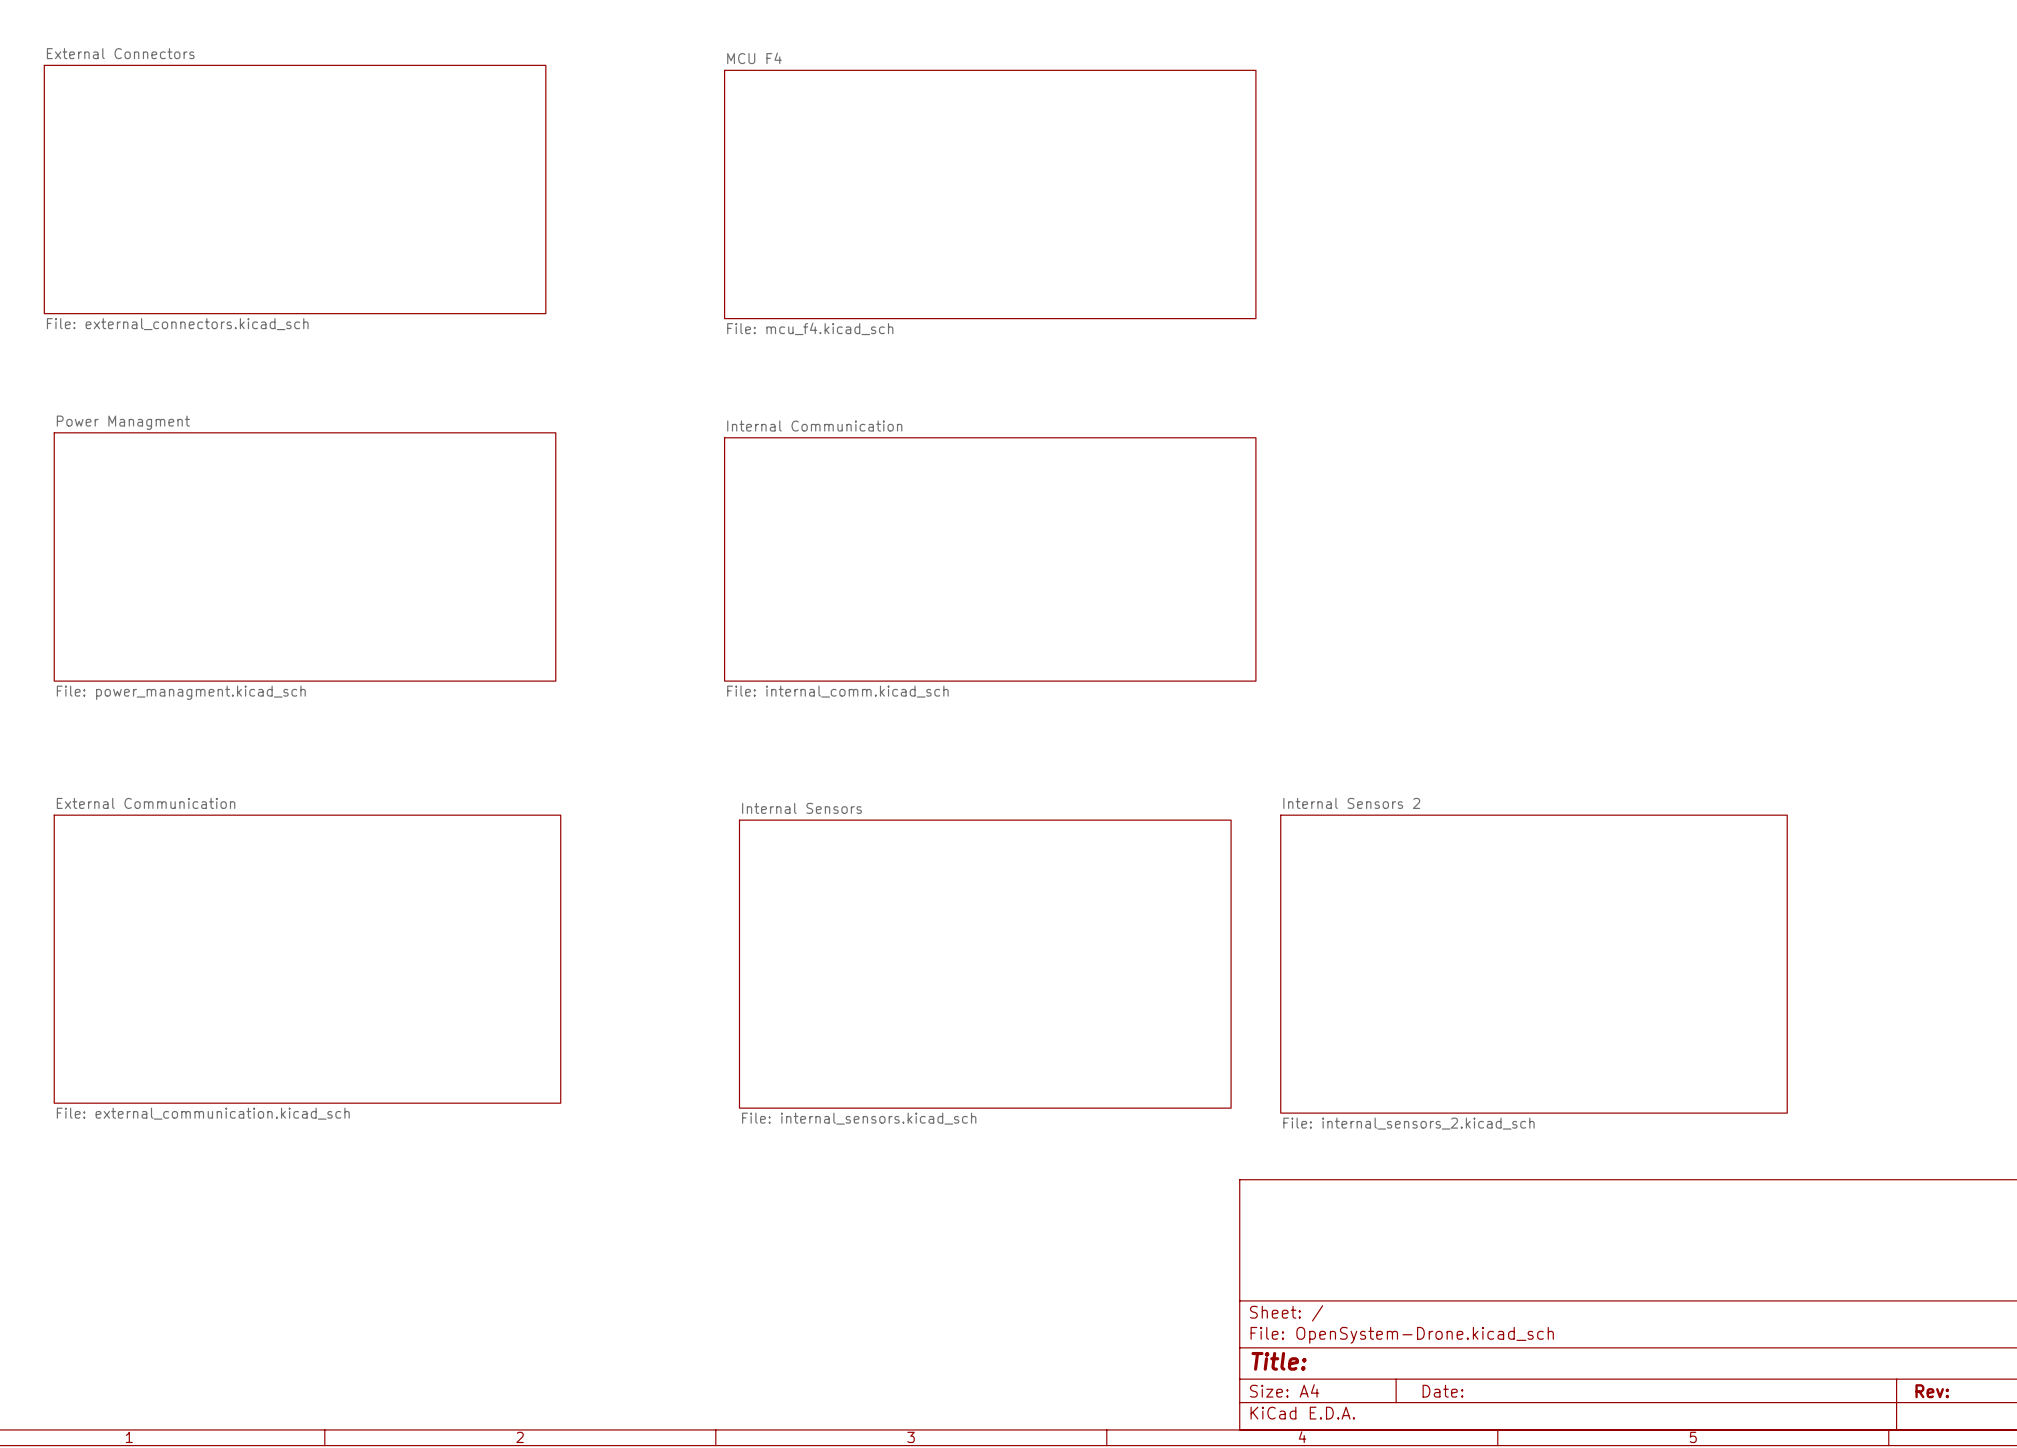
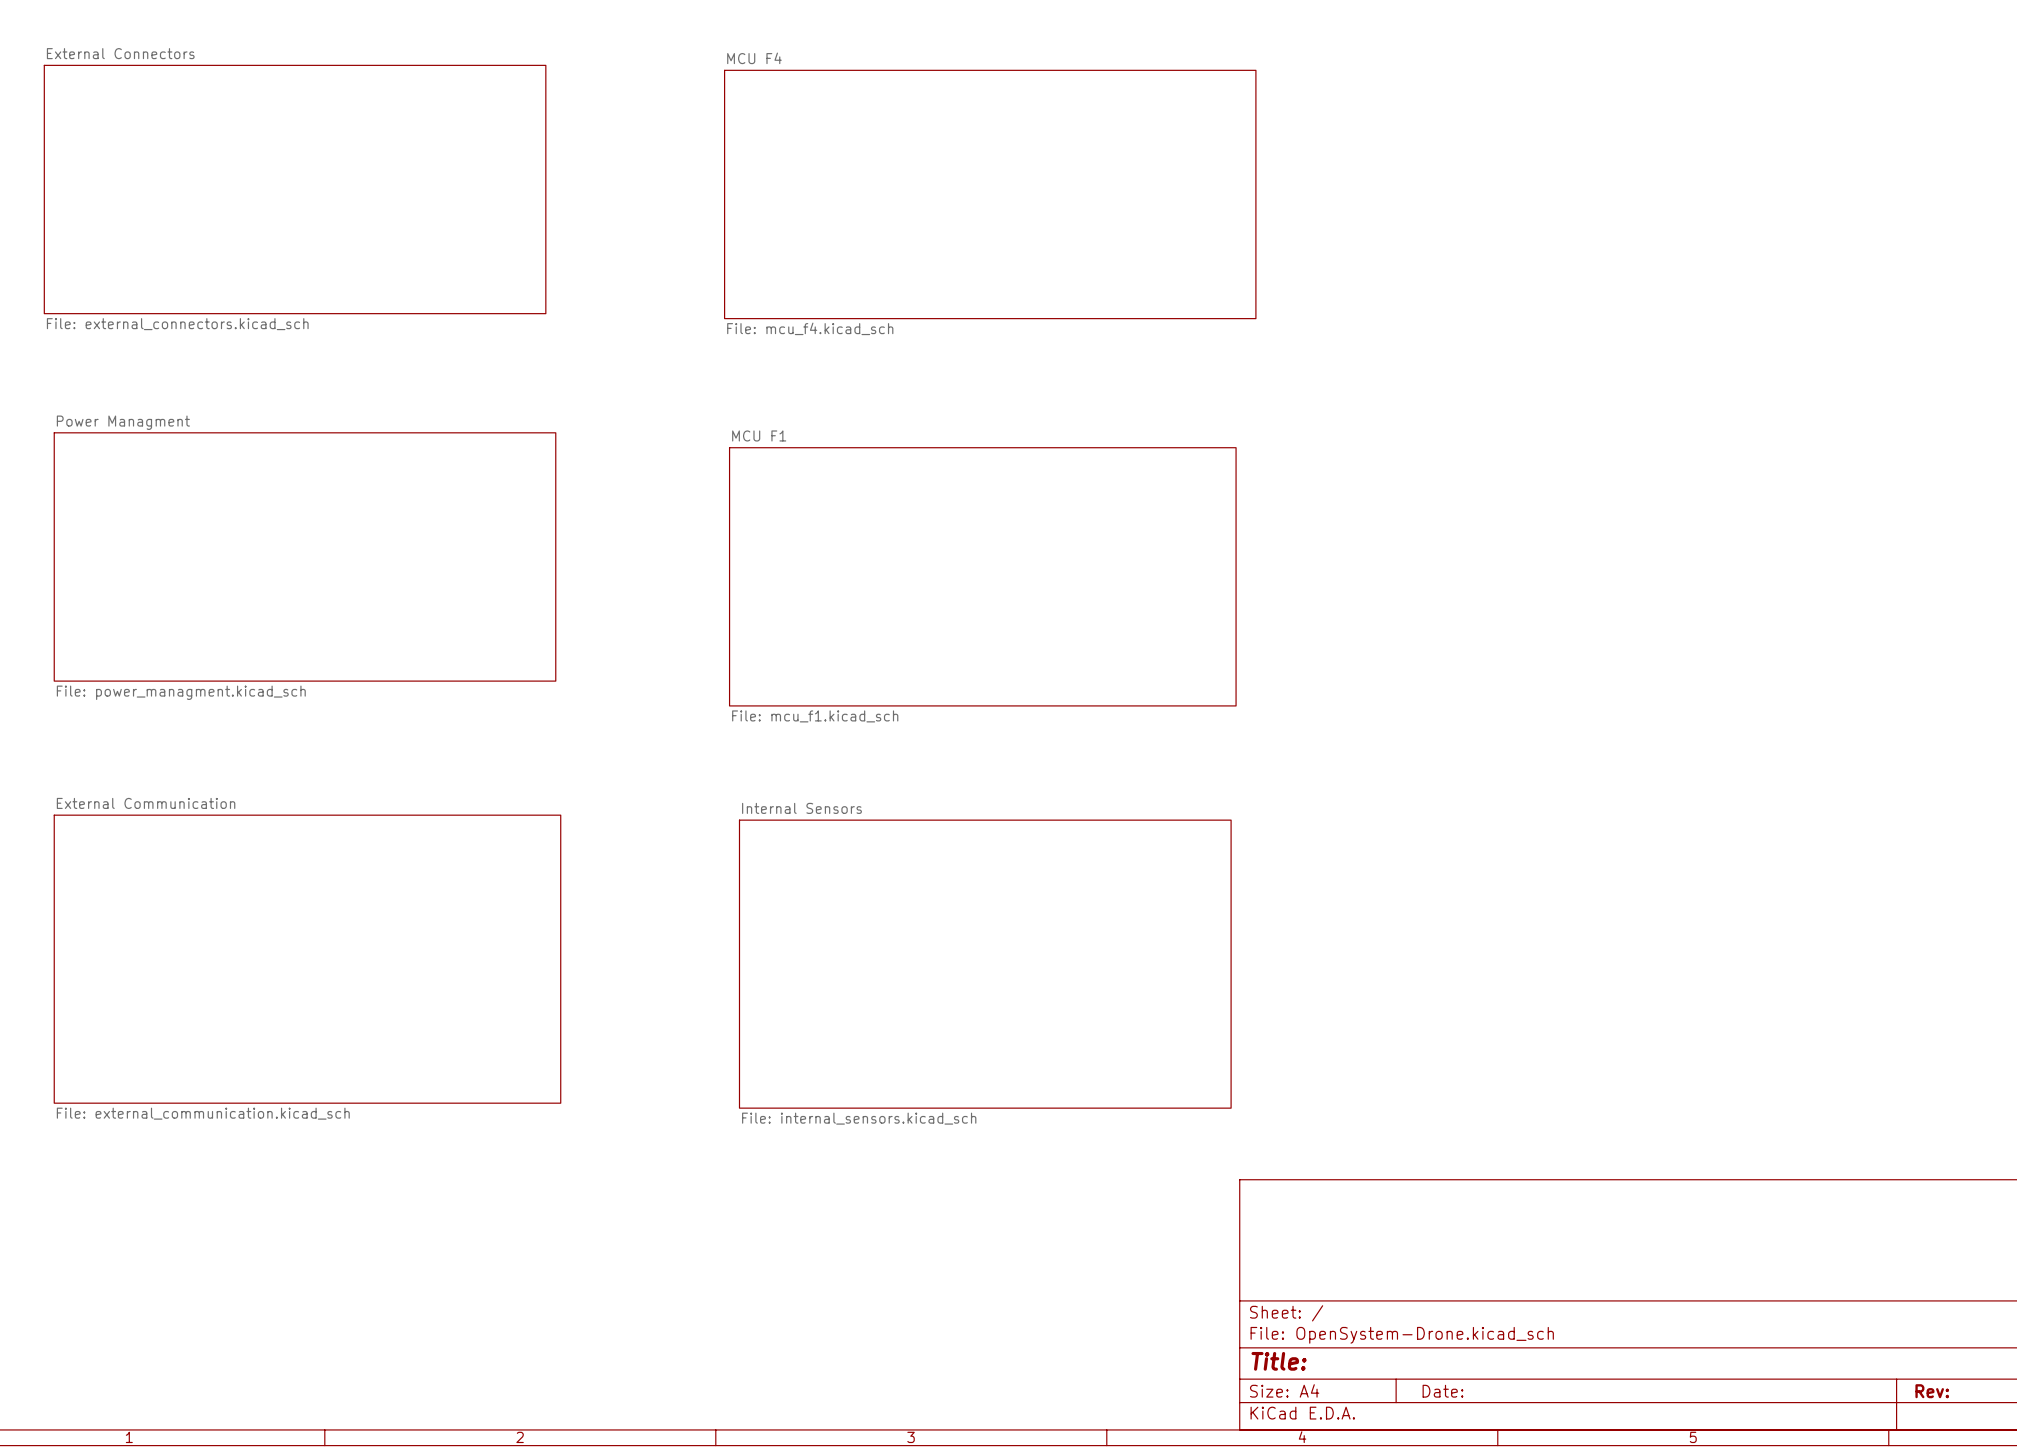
sheet Internal Communication: File: internal_comm.kicad_sch (990, 559) -> none
sheet MCU F1: none -> File: mcu_f1.kicad_sch (982, 576)
sheet Internal Sensors 2: File: internal_sensors_2.kicad_sch (1533, 964) -> none

